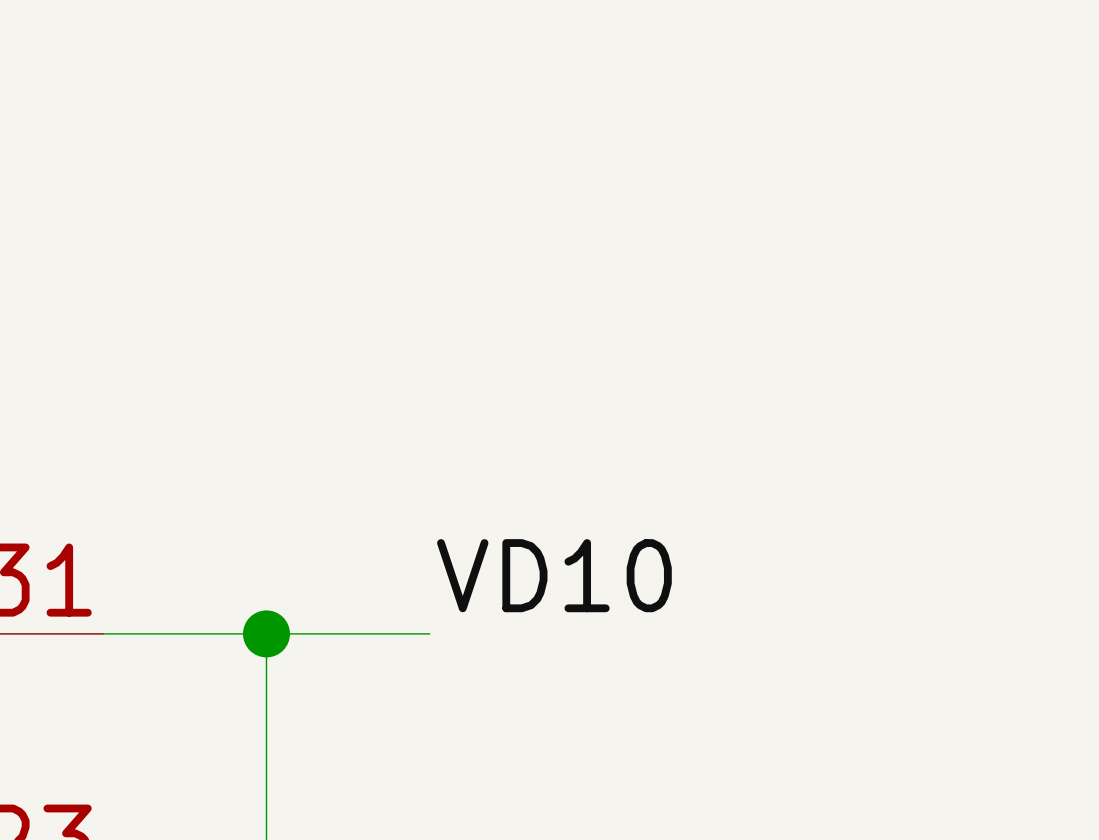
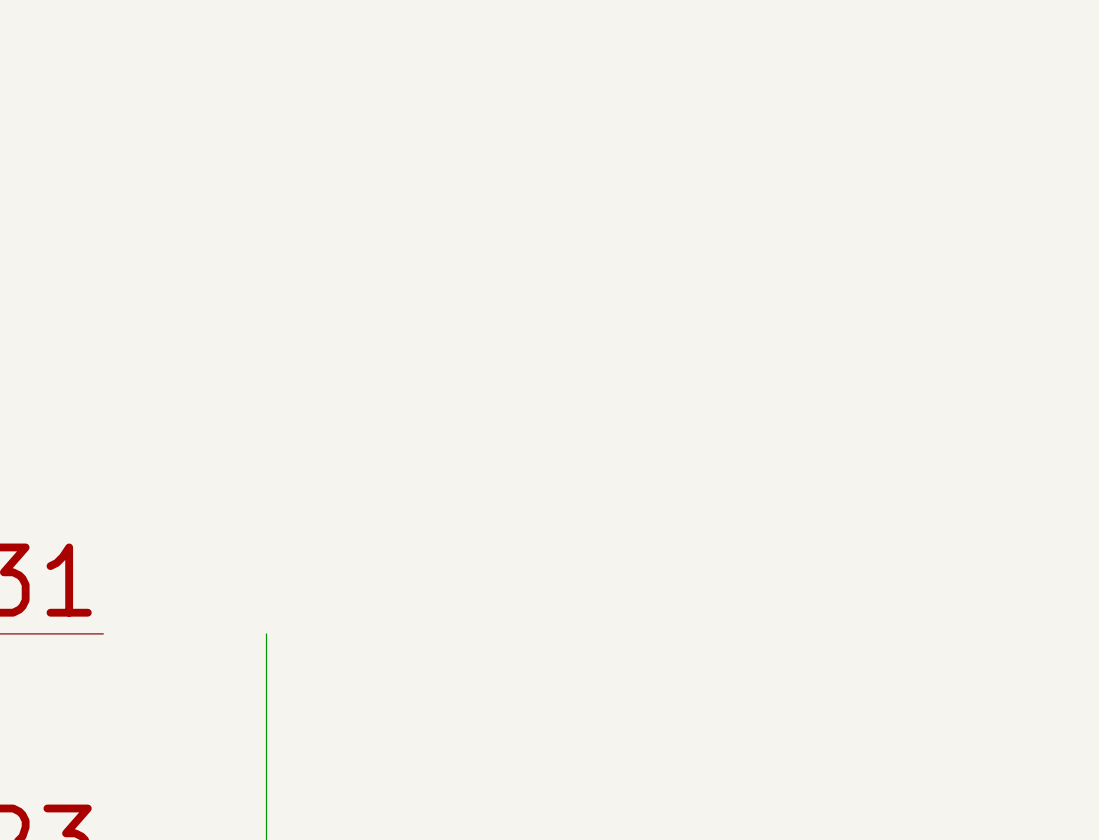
label: VD10 (554, 575) -> none
wire: (103, 633) (429, 633) -> none
junction: (266, 633) -> none

